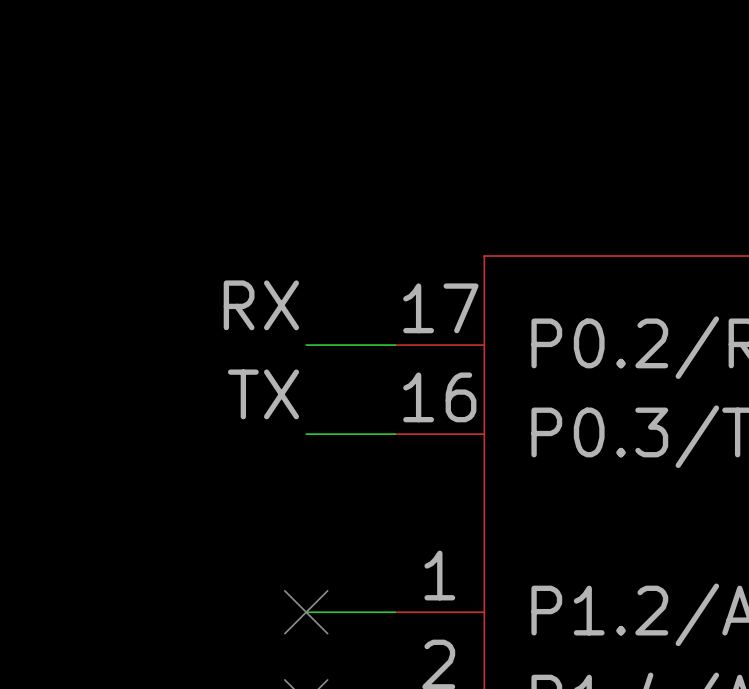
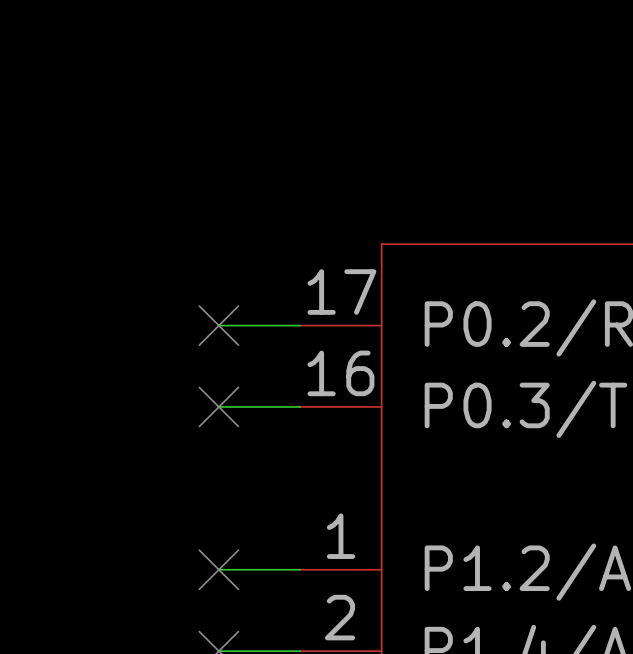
label: RX (261, 305) -> none
no-connect mark: none -> (218, 325)
label: TX (263, 394) -> none
no-connect mark: none -> (218, 406)

